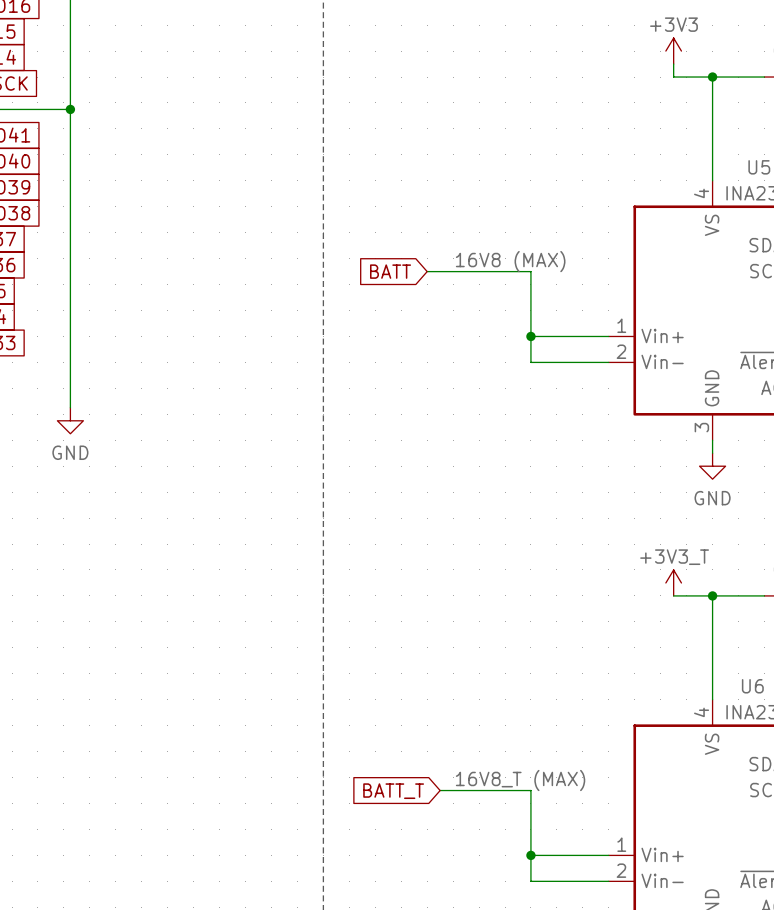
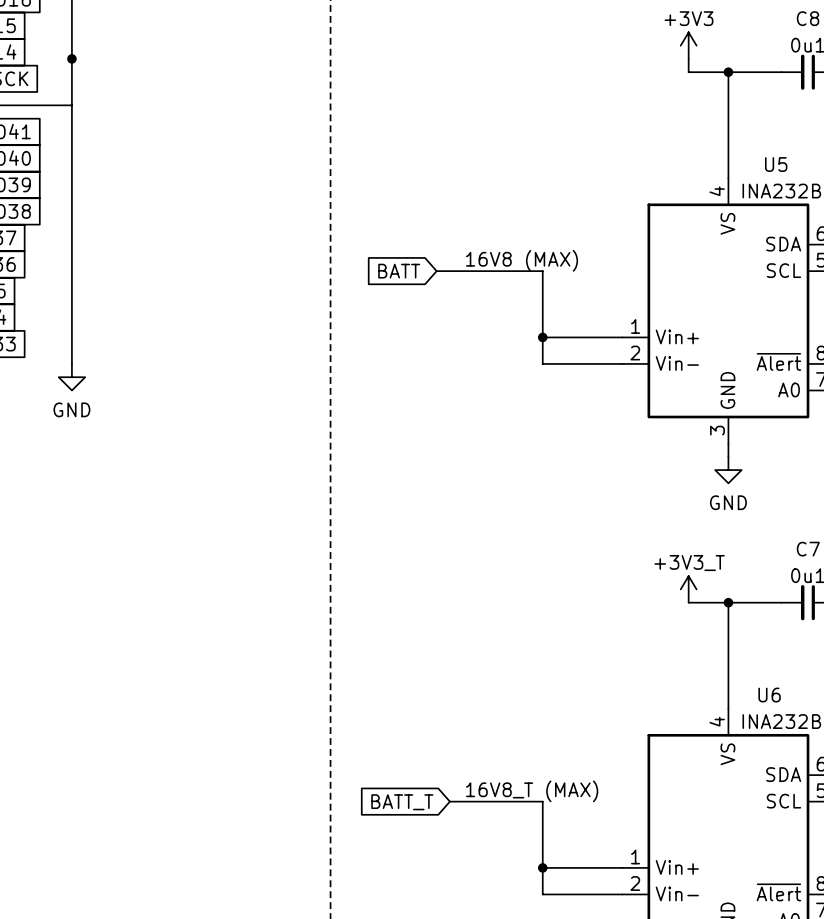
junction position: (70, 109) -> (71, 58)
wire: (70, 362) (70, 407) -> none
power symbol position: GND (70, 420) -> GND (71, 377)

